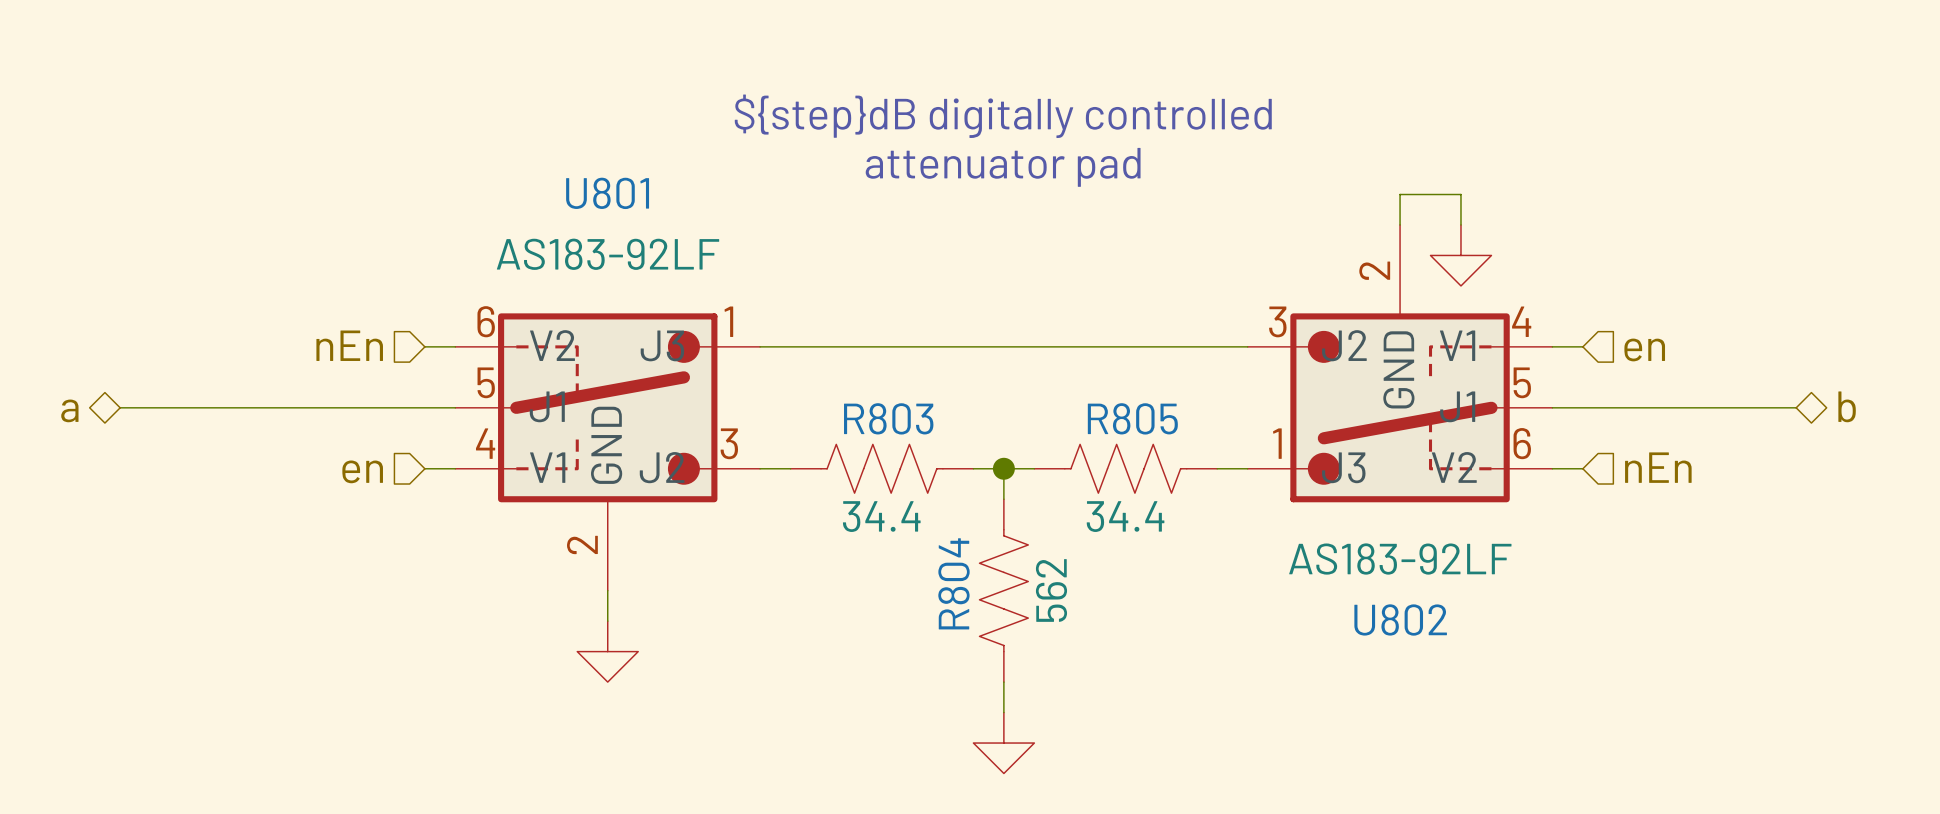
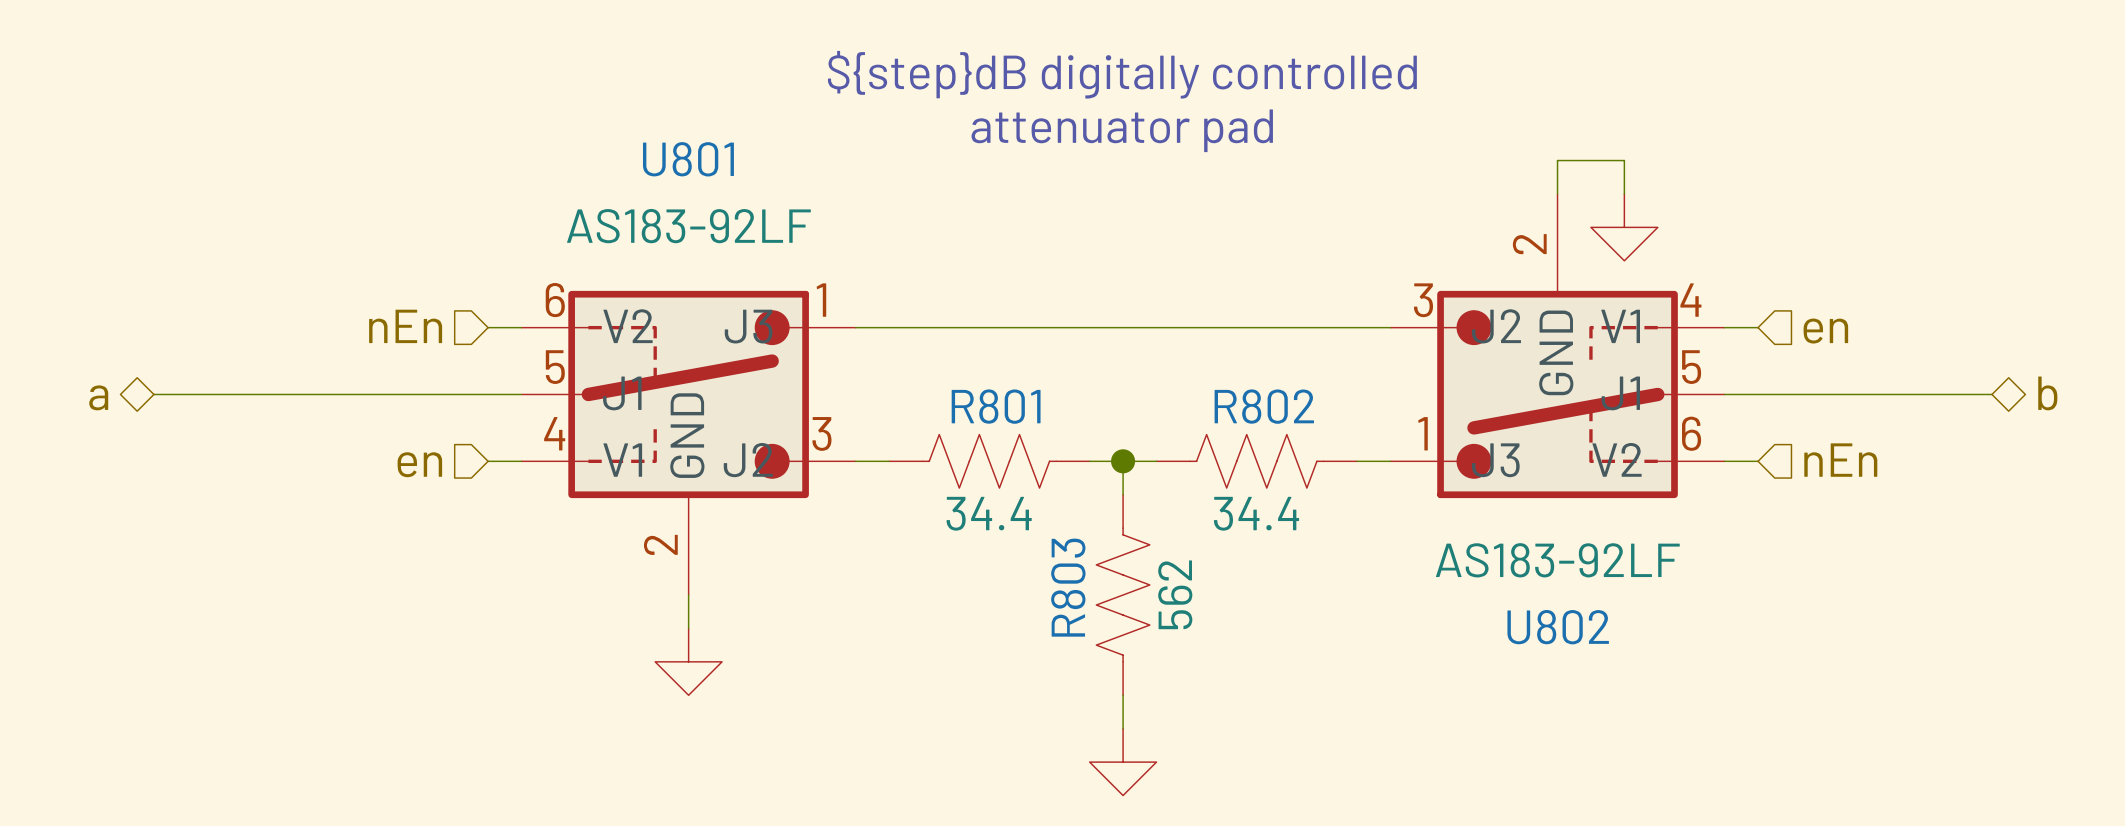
R803 name: R803 (888, 418) -> R801 (996, 406)
R805 name: R805 (1132, 418) -> R802 (1264, 406)
R804 name: R804 (953, 583) -> R803 (1068, 587)

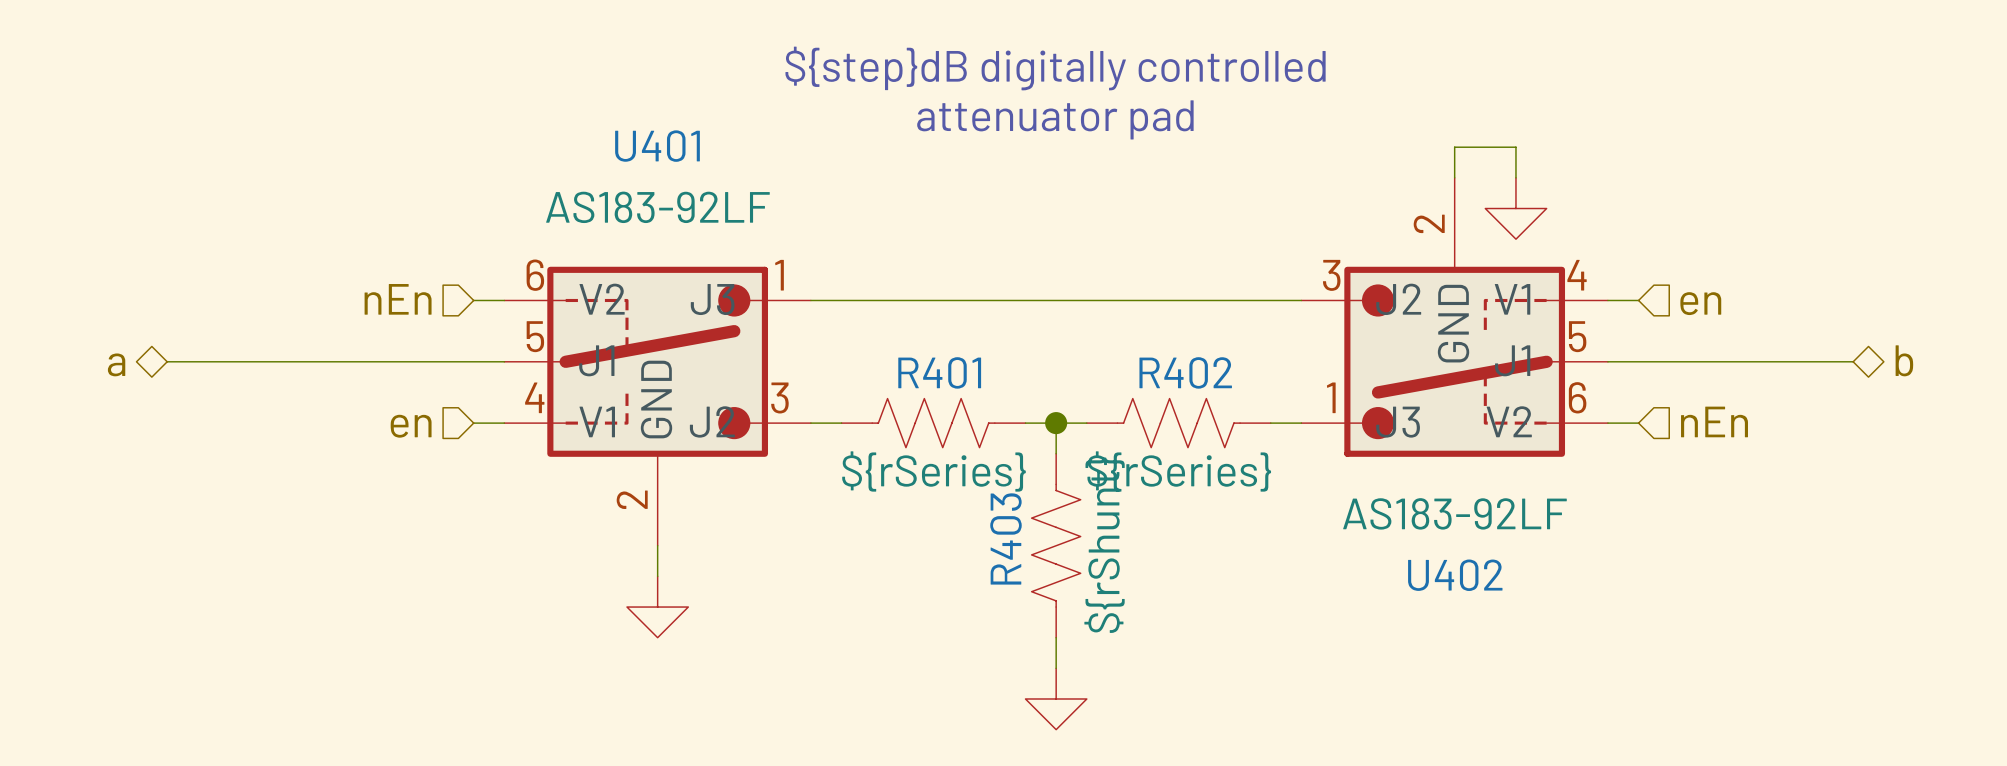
U801 name: U801 (688, 159) -> U401 (657, 146)
R801 name: R801 (996, 406) -> R401 (939, 372)
R802 name: R802 (1264, 406) -> R402 (1185, 372)
R801 value: 34.4 (989, 513) -> ${rSeries} (934, 471)
R802 value: 34.4 (1256, 513) -> ${rSeries} (1179, 471)
R803 name: R803 (1068, 587) -> R403 (1005, 538)
R803 value: 562 (1175, 594) -> ${rShunt} (1104, 545)
U802 name: U802 (1558, 627) -> U402 (1455, 575)

